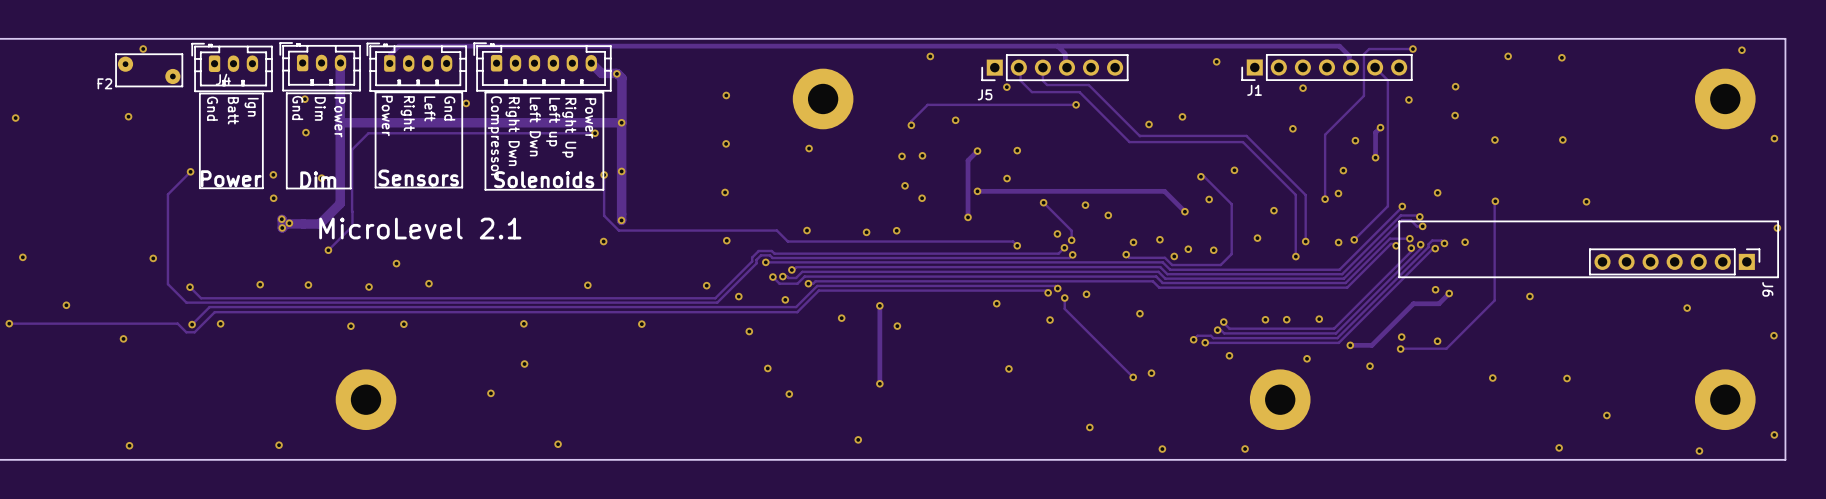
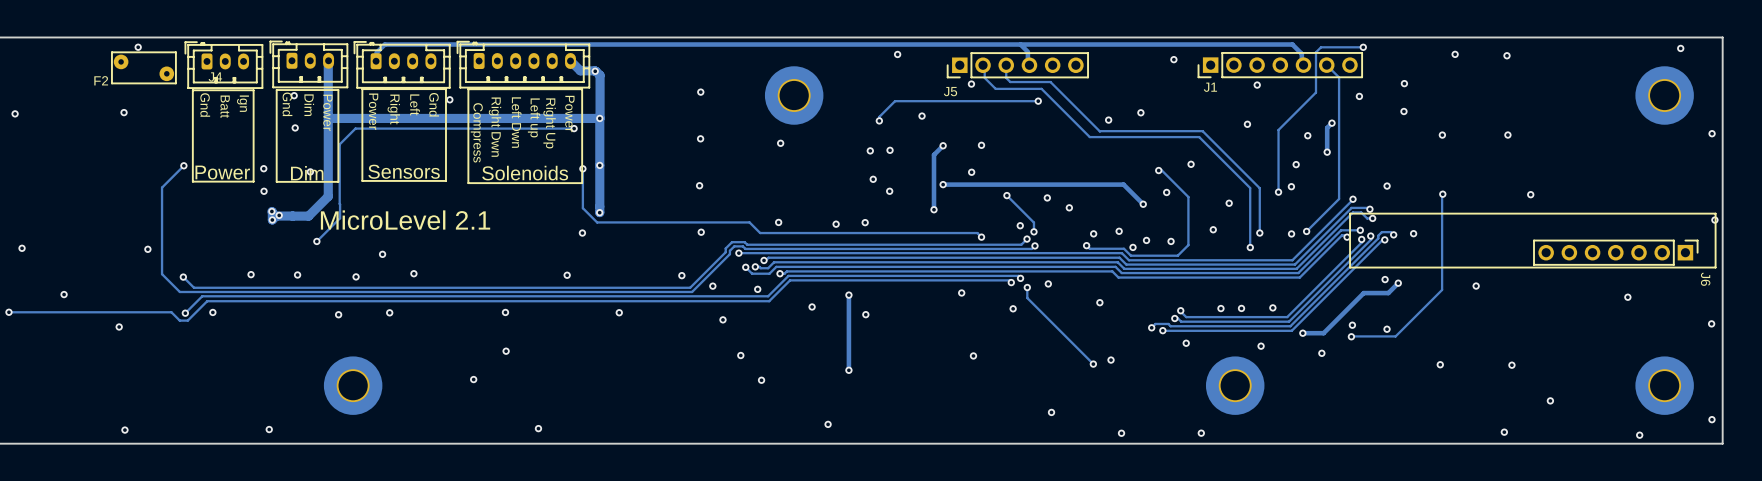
text: Compressor (494, 137) -> Compress (476, 132)

